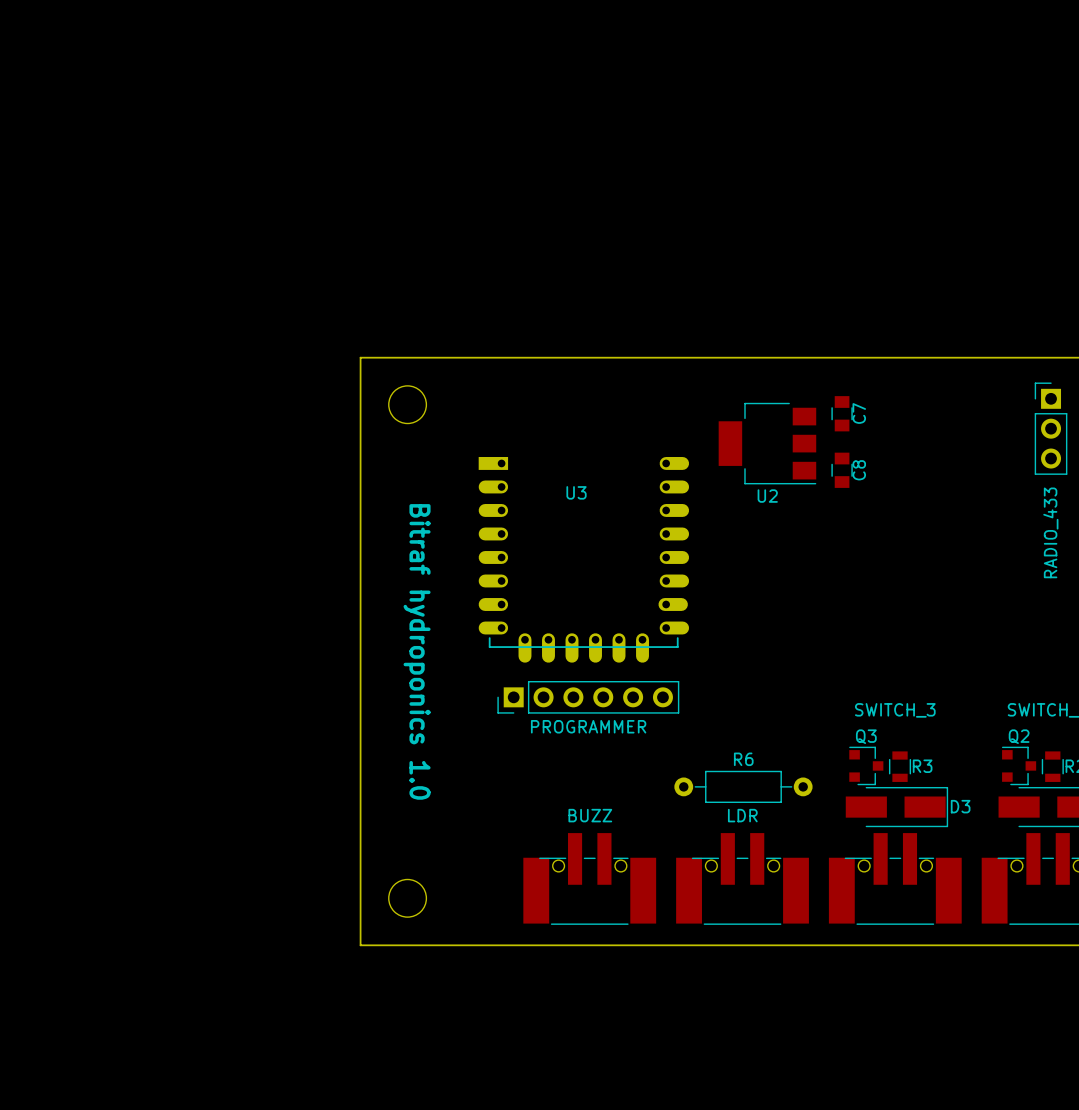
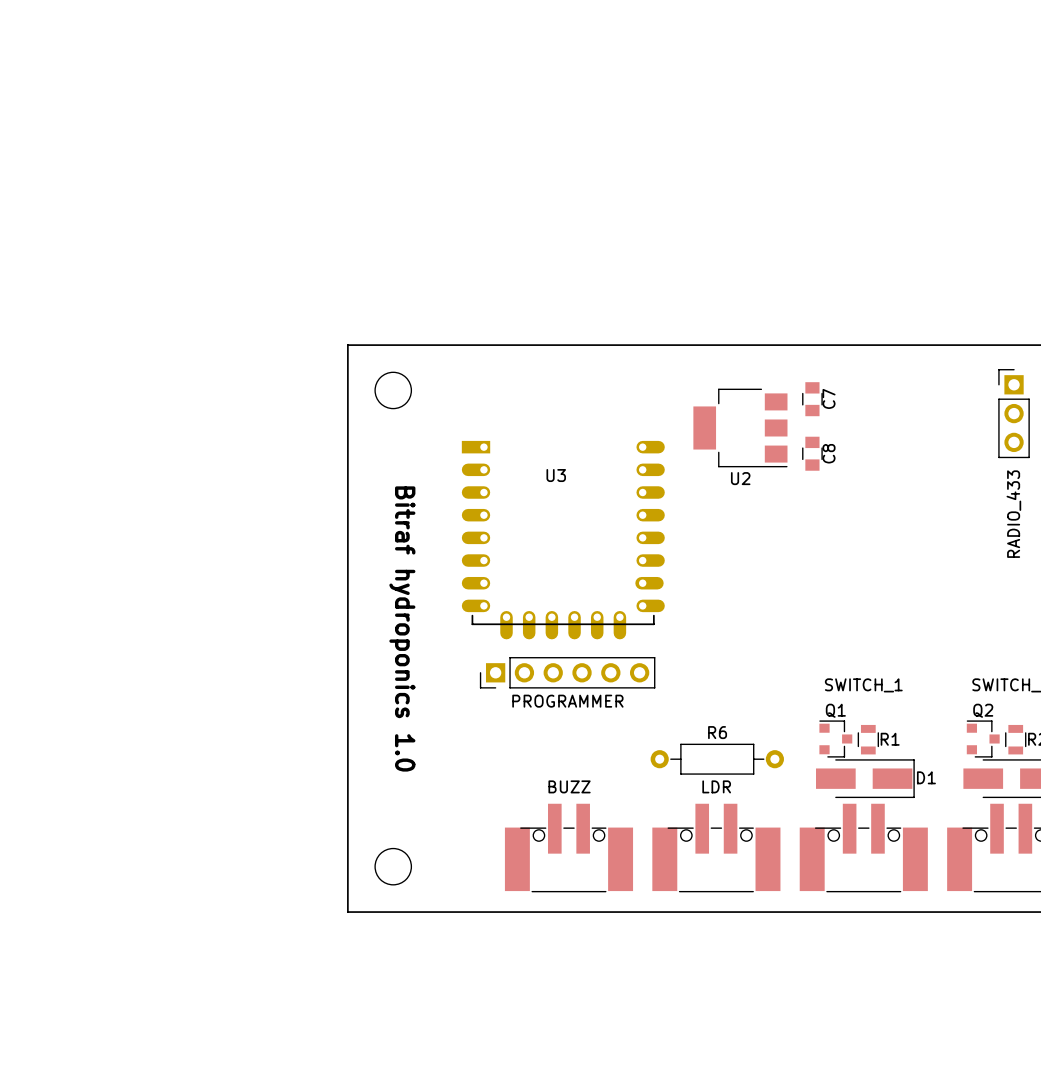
part value: SWITCH_3 (895, 710) -> SWITCH_1 (863, 685)
Q3 name: Q3 (866, 736) -> Q1 (835, 710)
R3 name: R3 (922, 766) -> R1 (890, 739)
D3 name: D3 (960, 806) -> D1 (926, 777)

